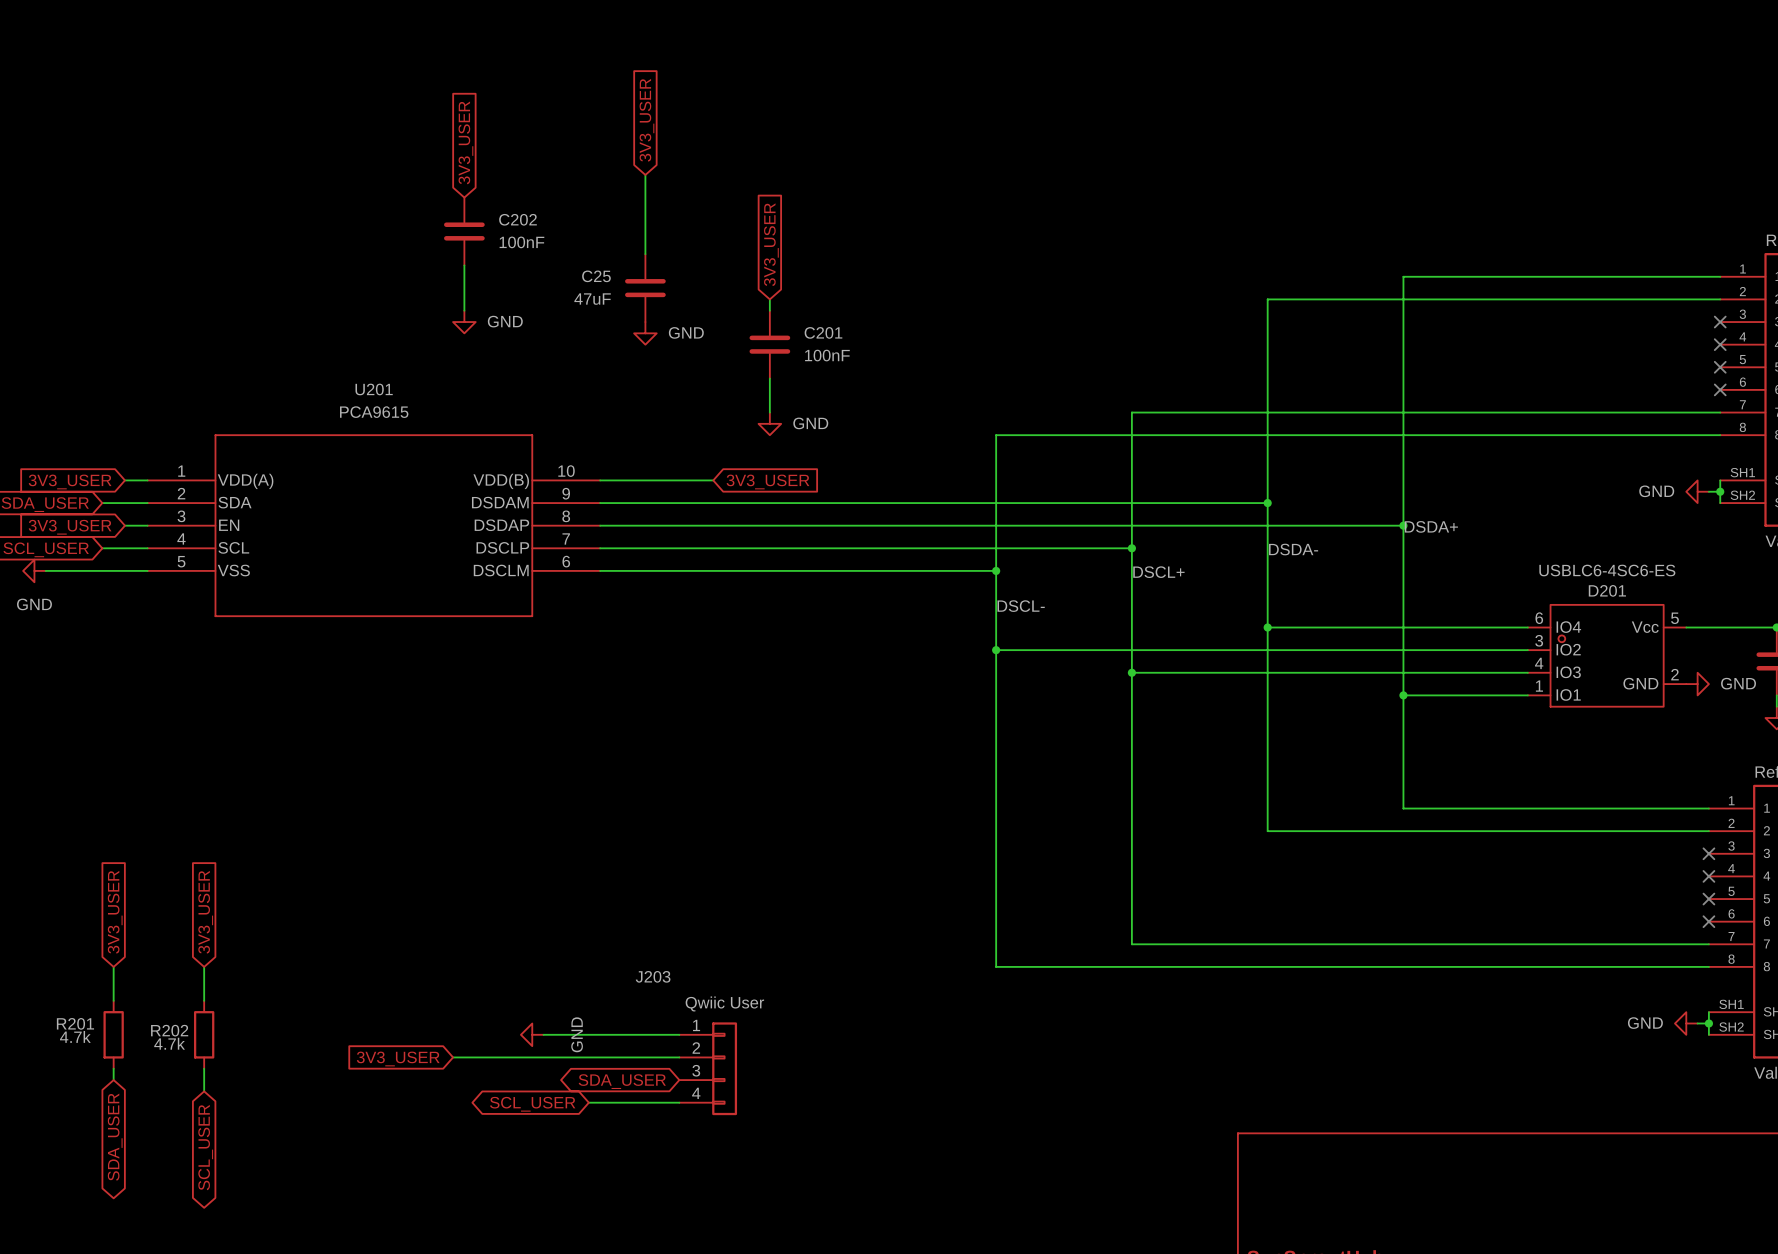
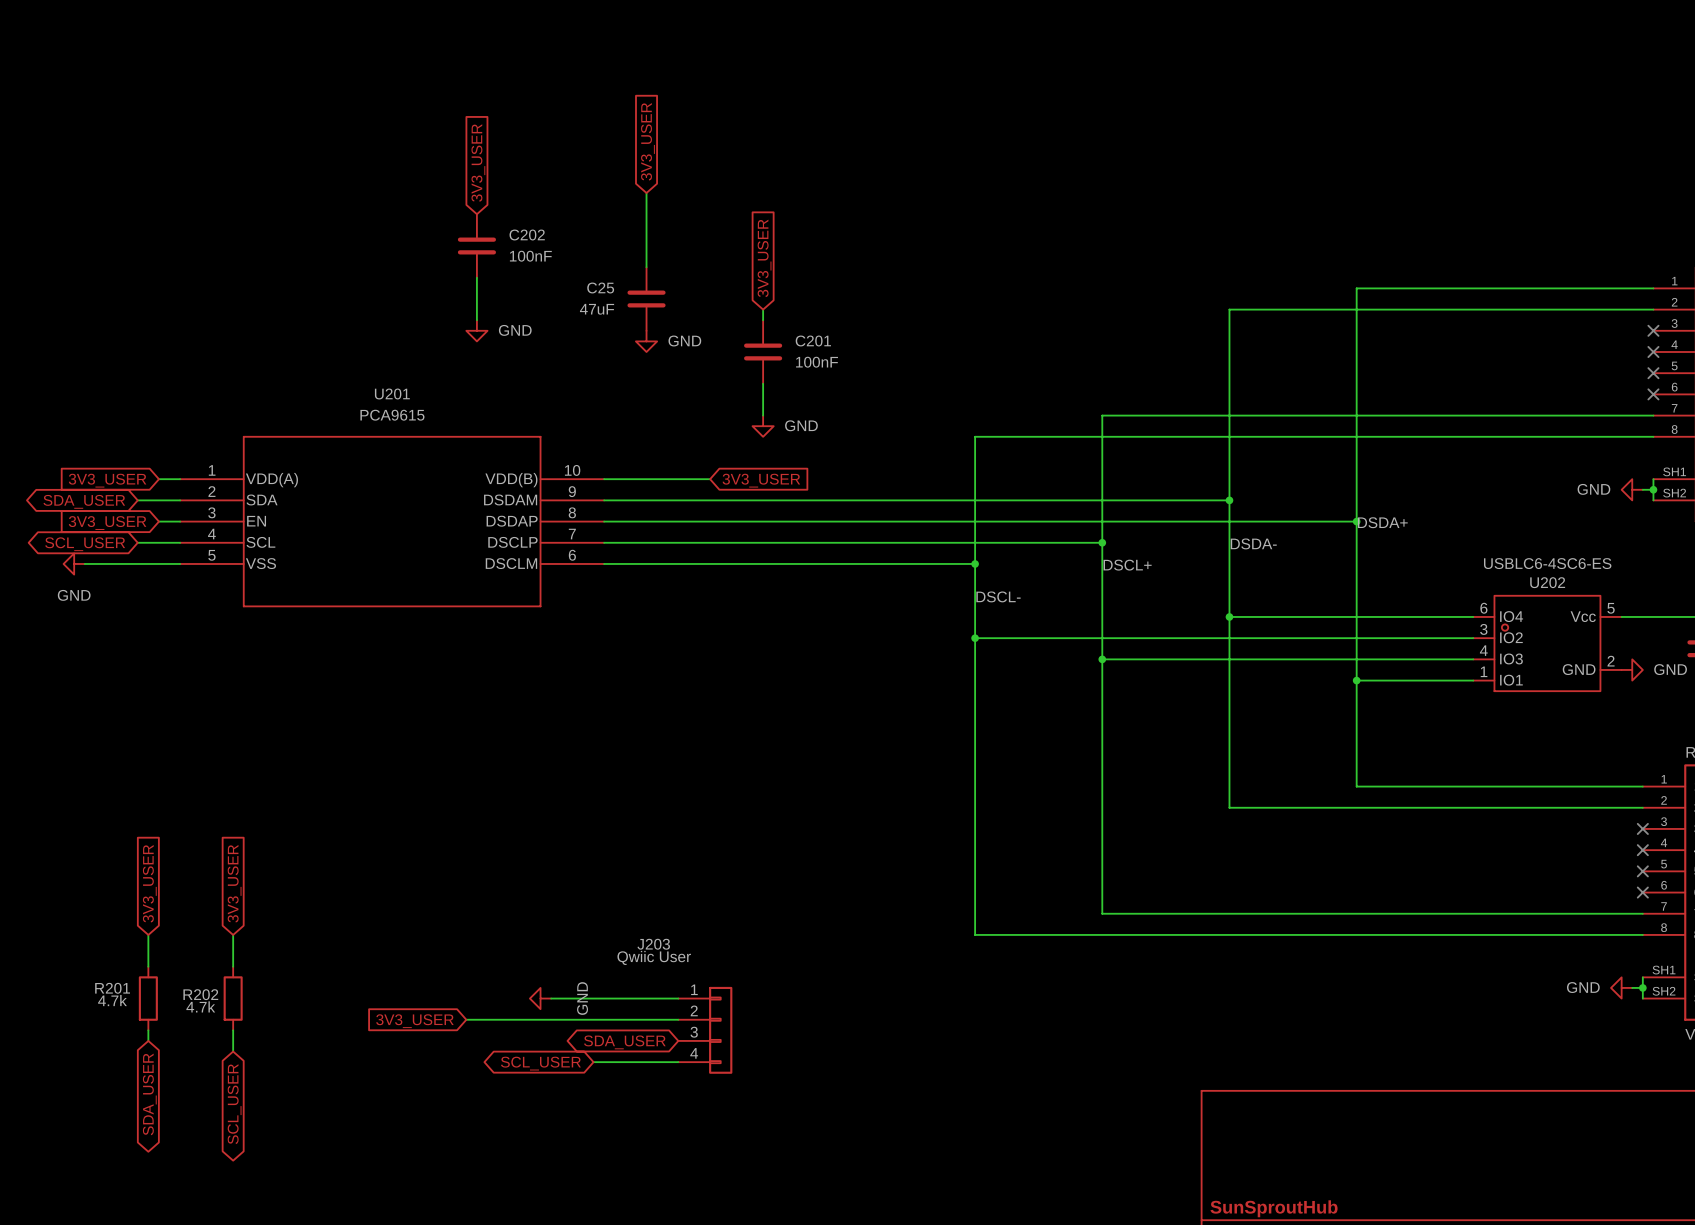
D201 name: D201 (1607, 590) -> U202 (1547, 582)
J203 value: none -> Qwiic User (654, 957)
J203 text: Qwiic User (724, 1003) -> none

